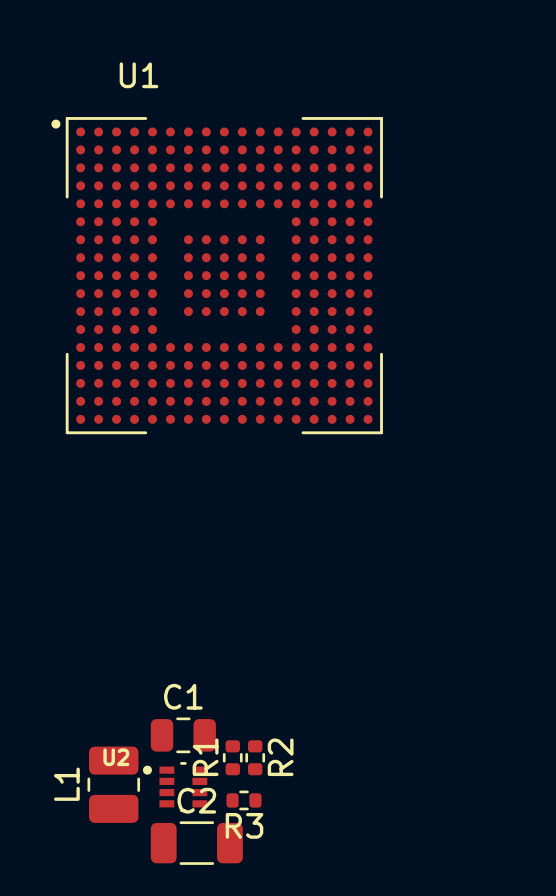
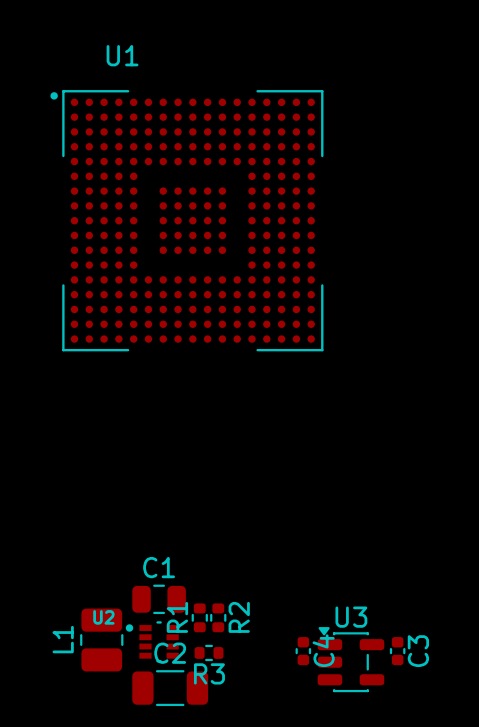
C4: none -> (303, 651)
C3: none -> (397, 651)
U3: none -> (350, 659)

